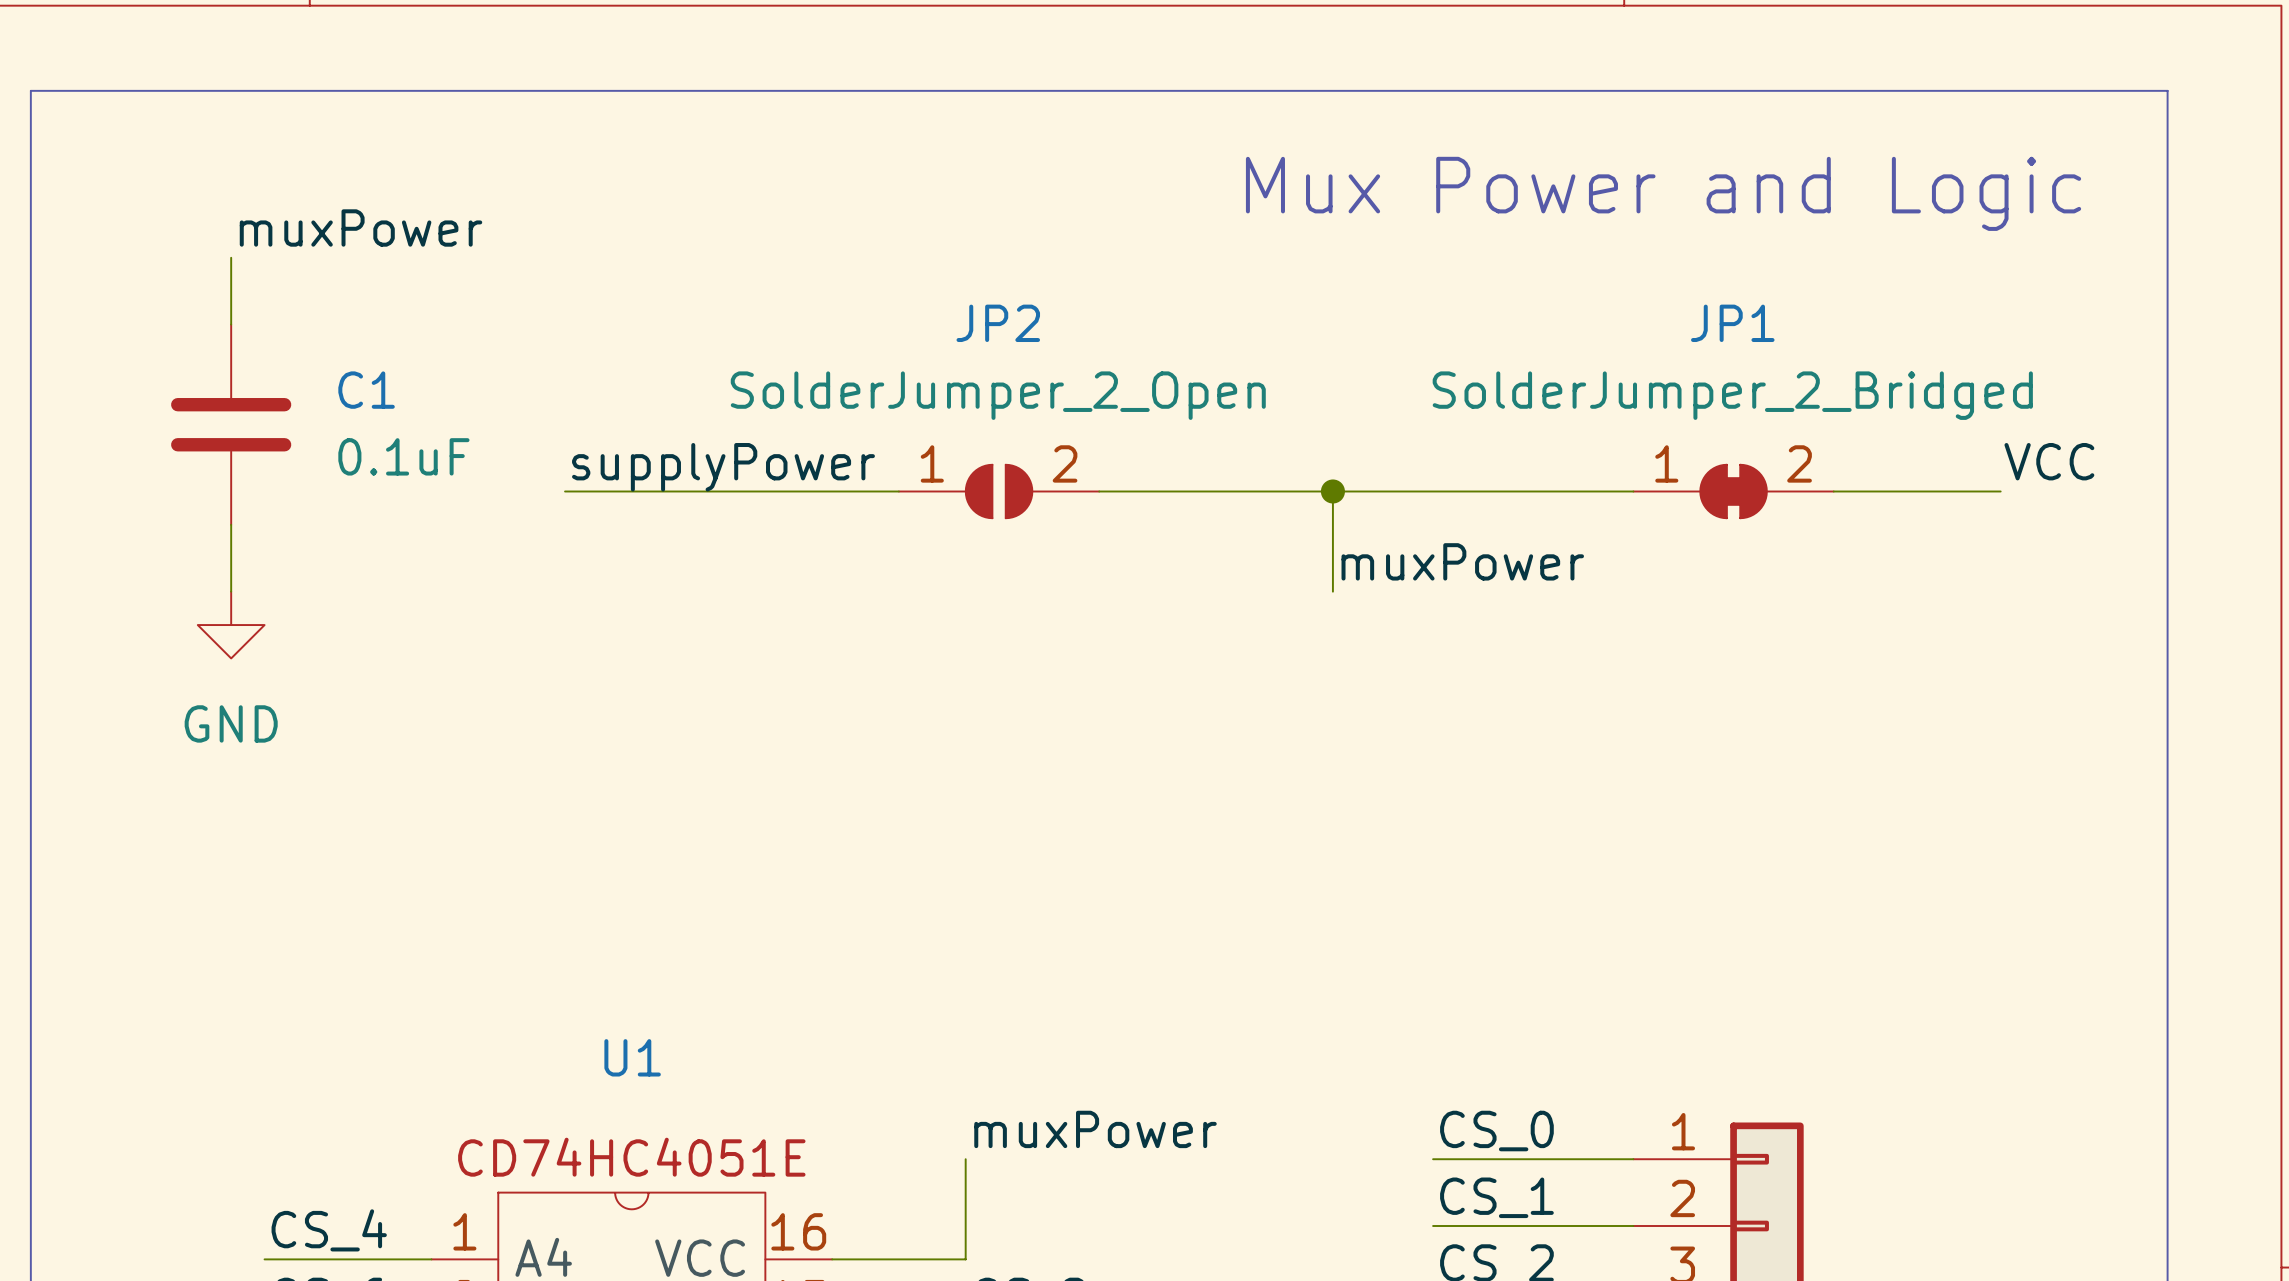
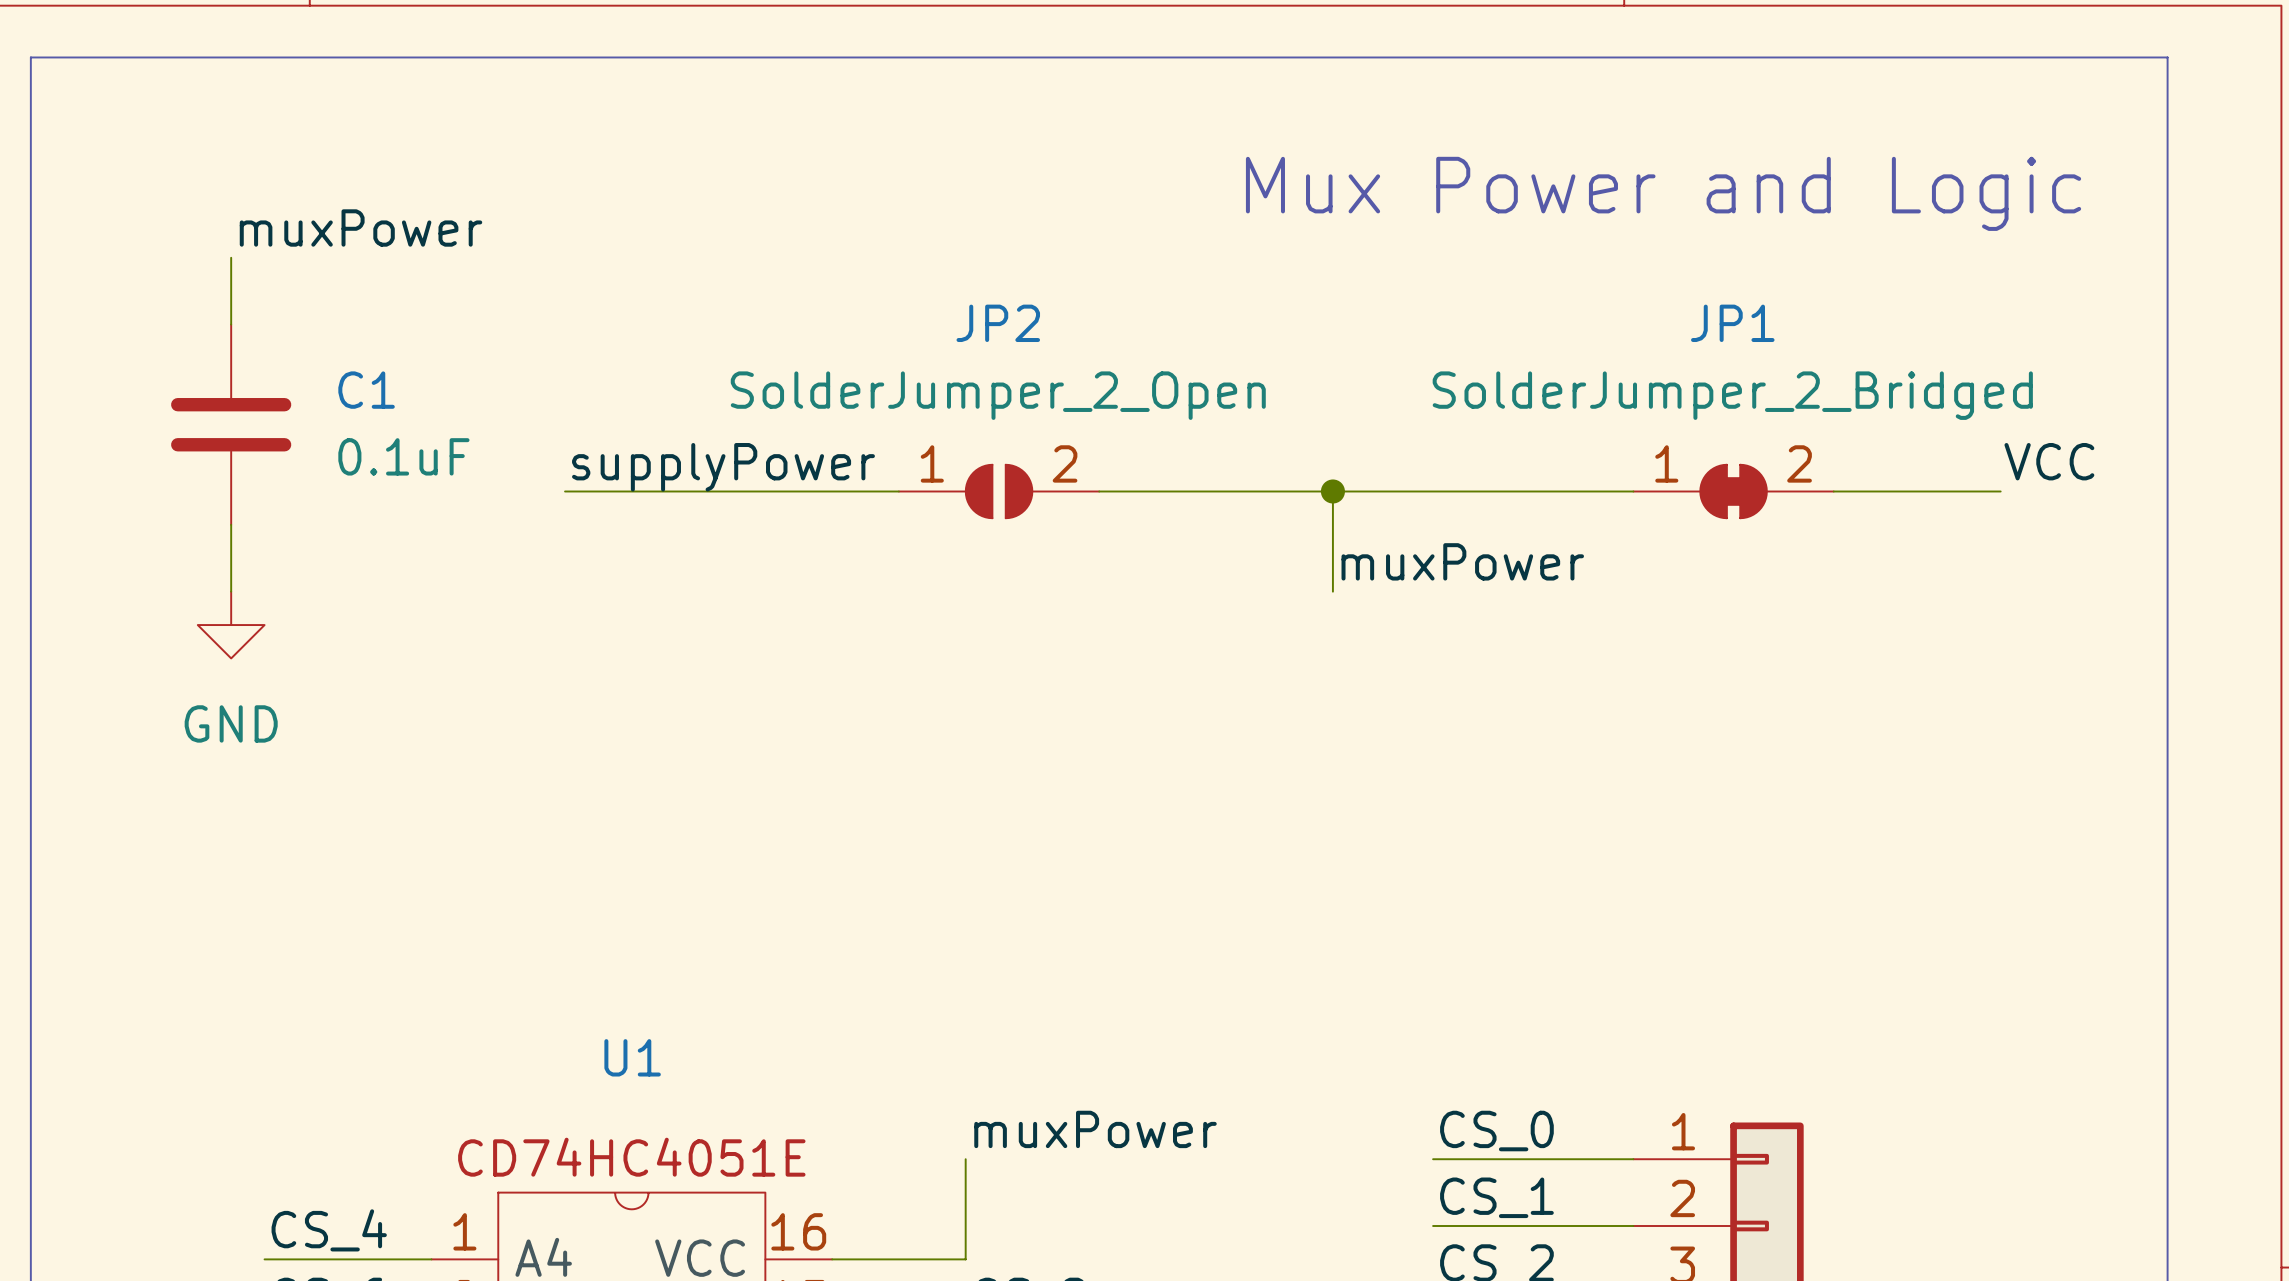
line: (30, 90) (2167, 90) -> (30, 90) (30, 57) (2167, 57) (2167, 90)

